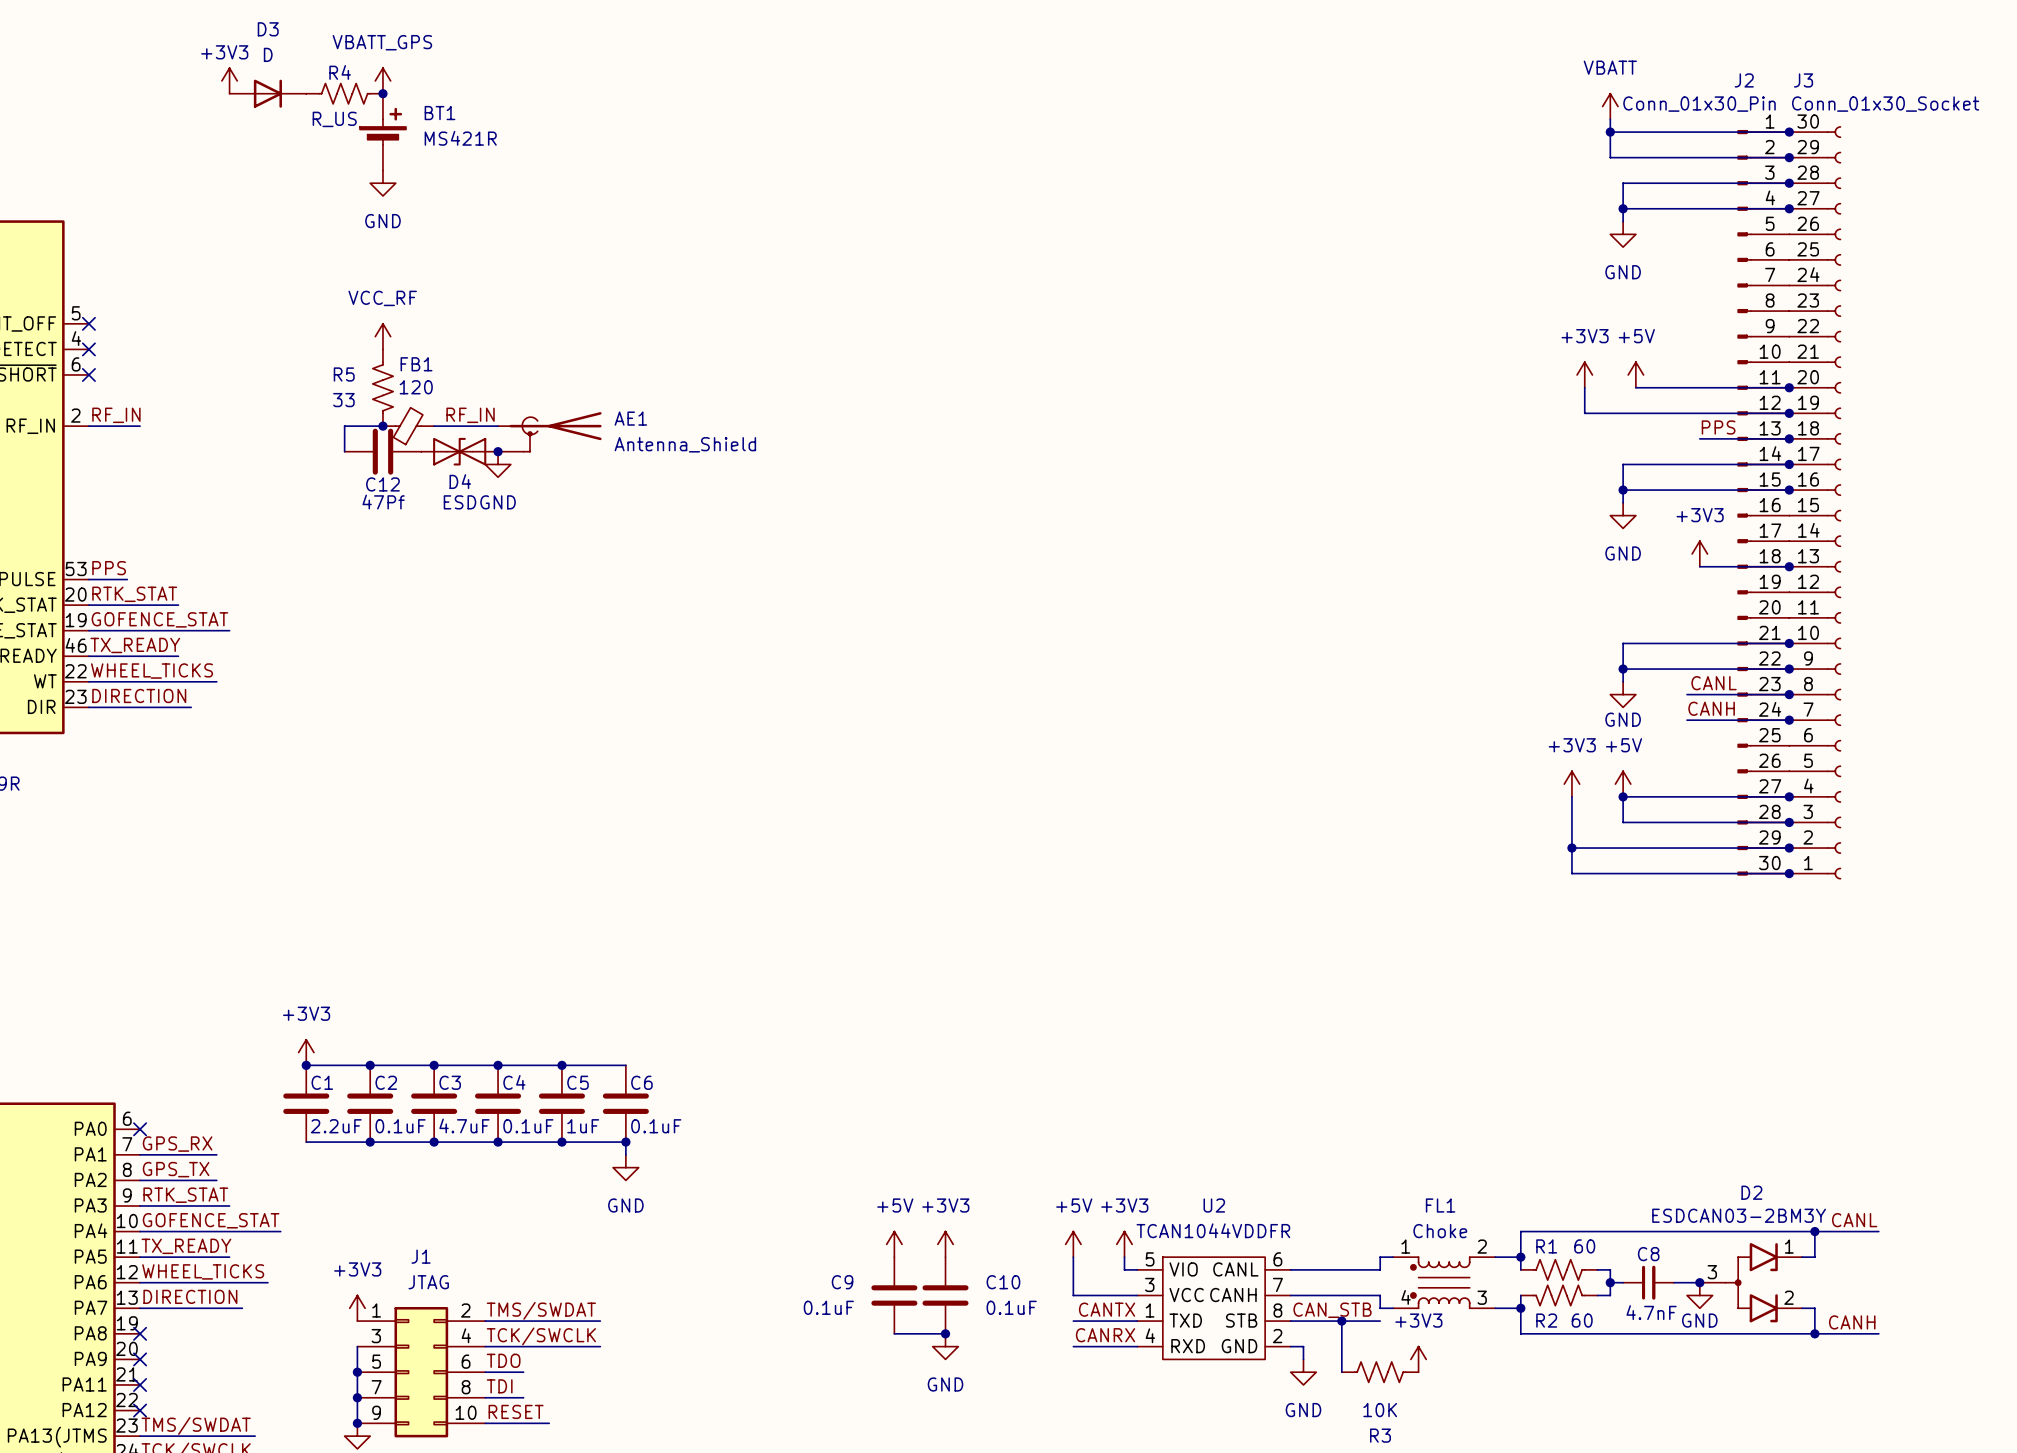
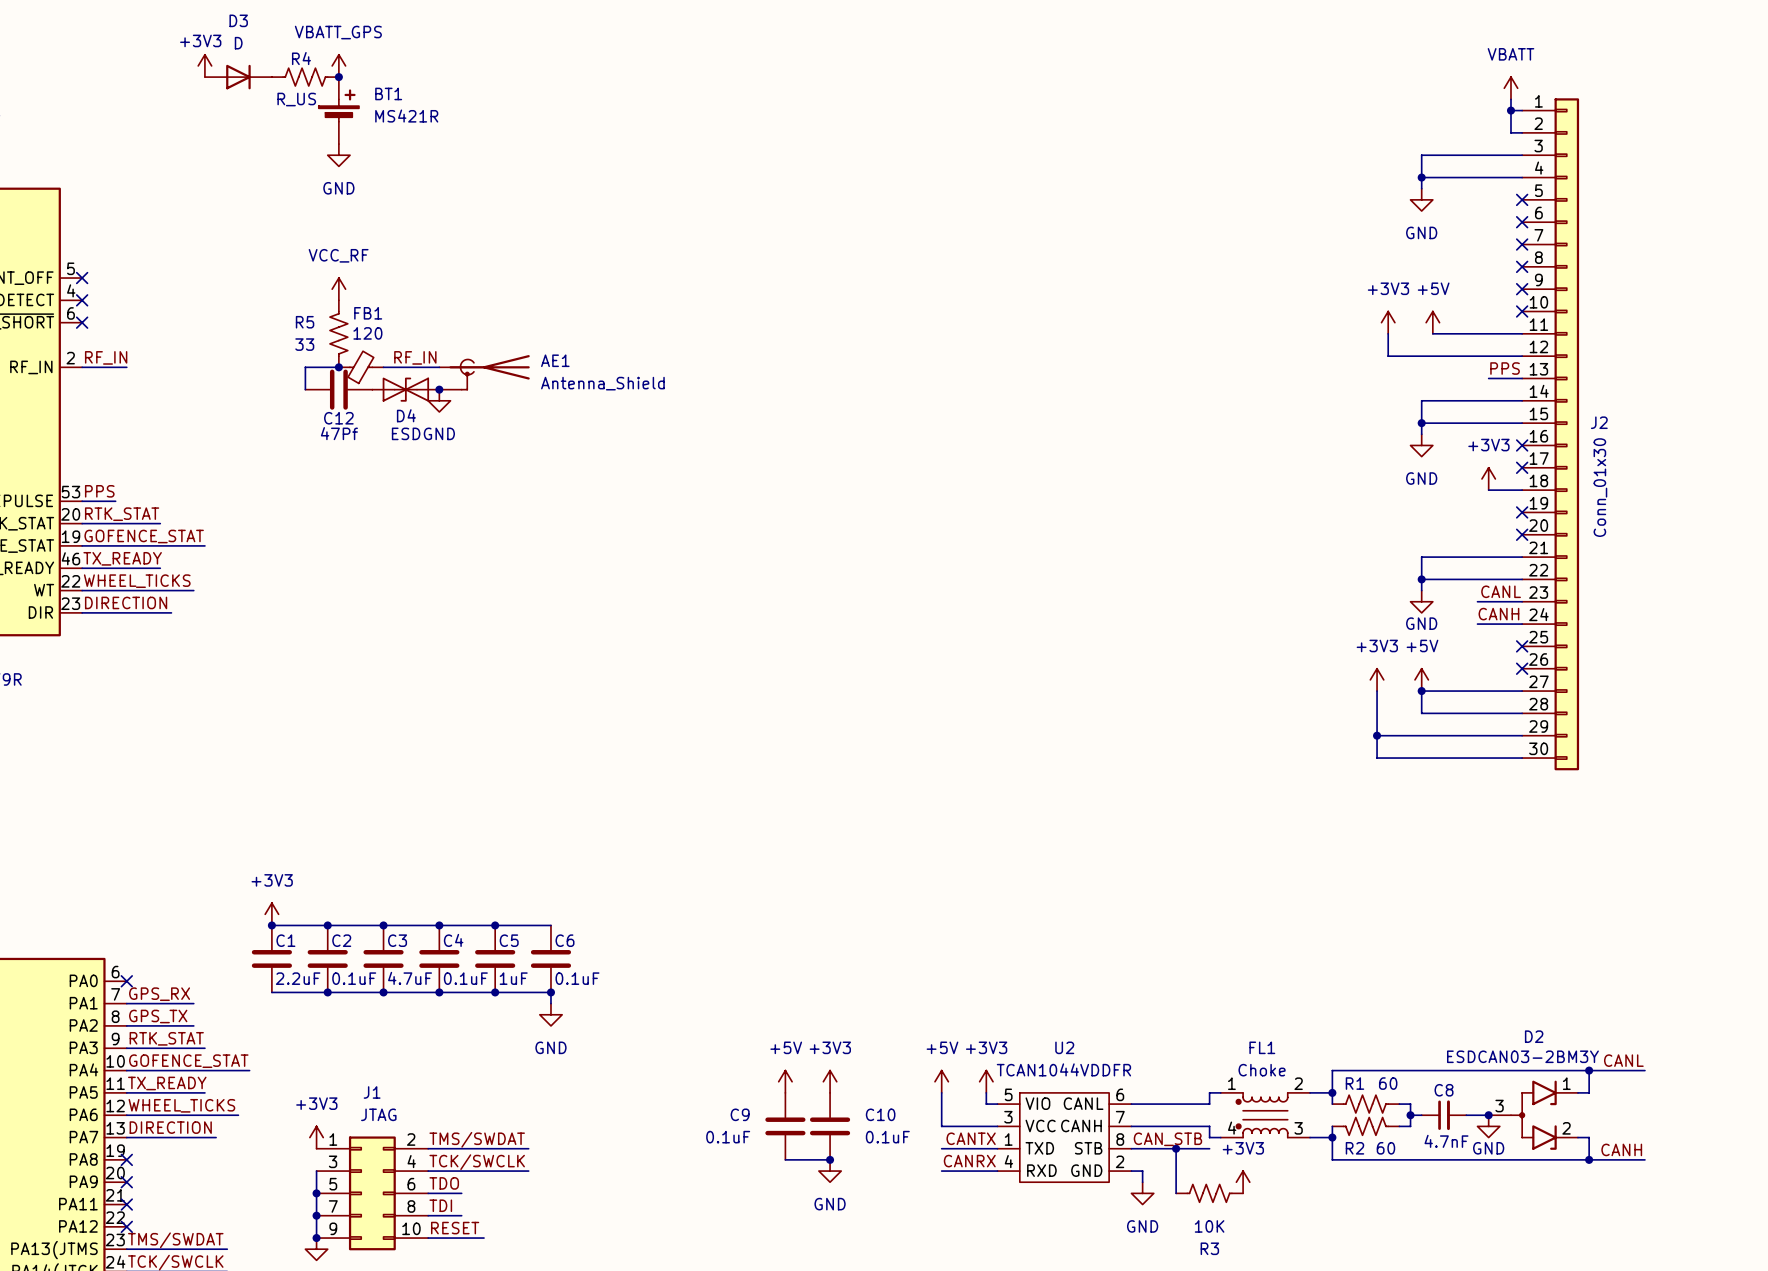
J2 name position: J2 (1744, 80) -> J2 (1599, 422)
J2 value: Conn_01x30_Pin (1699, 104) -> Conn_01x30 (1600, 487)
power symbol position: VBATT (1610, 106) -> VBATT (1510, 88)
wire: (1610, 119) (1610, 157) (1725, 157) -> (1510, 99) (1510, 132)
J2 symbol: [1737, 130, 1790, 876] -> [1522, 98, 1580, 771]
wire: (1610, 132) (1725, 132) -> none
junction: (1610, 132) -> none
junction: none -> (1510, 110)
junction: (1789, 132) -> none
junction: (1789, 157) -> none
junction: (1789, 183) -> none
junction: (1789, 208) -> none
no-connect mark: none -> (1522, 199)
no-connect mark: none -> (1522, 222)
no-connect mark: none -> (1522, 244)
no-connect mark: none -> (1522, 266)
no-connect mark: none -> (1522, 289)
no-connect mark: none -> (1522, 311)
junction: (1789, 387) -> none
junction: (1789, 413) -> none
junction: (1789, 438) -> none
junction: (1789, 464) -> none
junction: (1789, 490) -> none
J3: Conn_01x30_Socket (1815, 502) -> none
no-connect mark: none -> (1522, 445)
no-connect mark: none -> (1522, 467)
junction: (1789, 566) -> none
no-connect mark: none -> (1522, 512)
no-connect mark: none -> (1522, 534)
junction: (1789, 643) -> none
junction: (1789, 669) -> none
junction: (1789, 694) -> none
junction: (1789, 720) -> none
no-connect mark: none -> (1522, 646)
no-connect mark: none -> (1522, 668)
junction: (1789, 796) -> none
junction: (1789, 822) -> none
junction: (1789, 848) -> none
junction: (1789, 873) -> none

